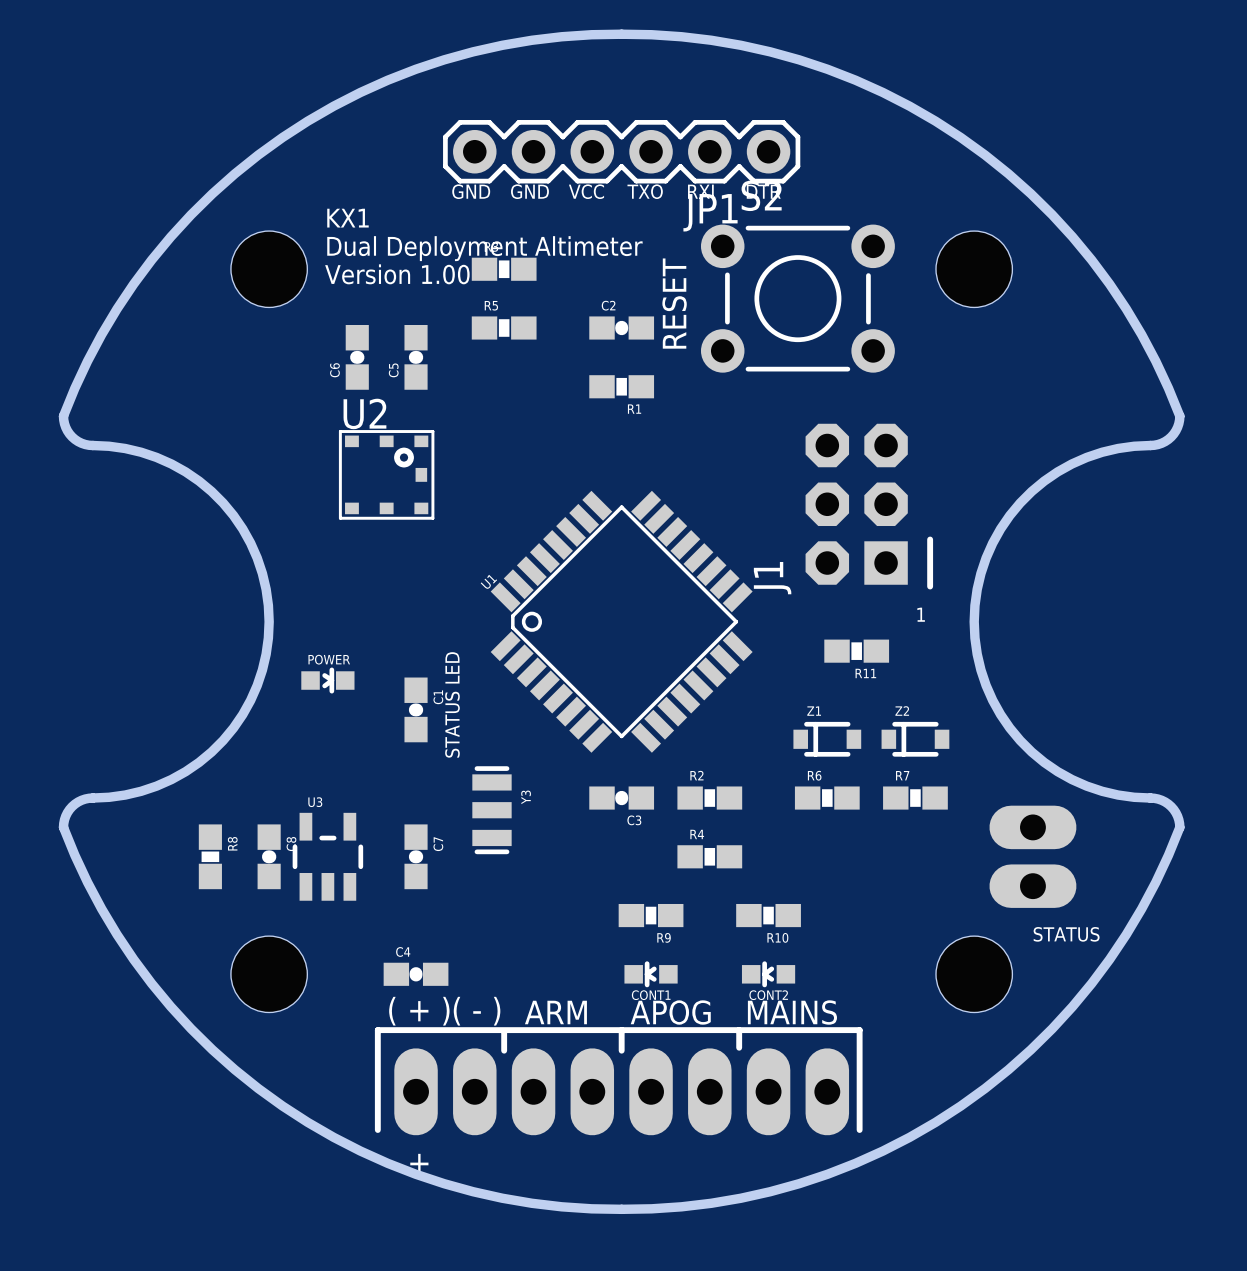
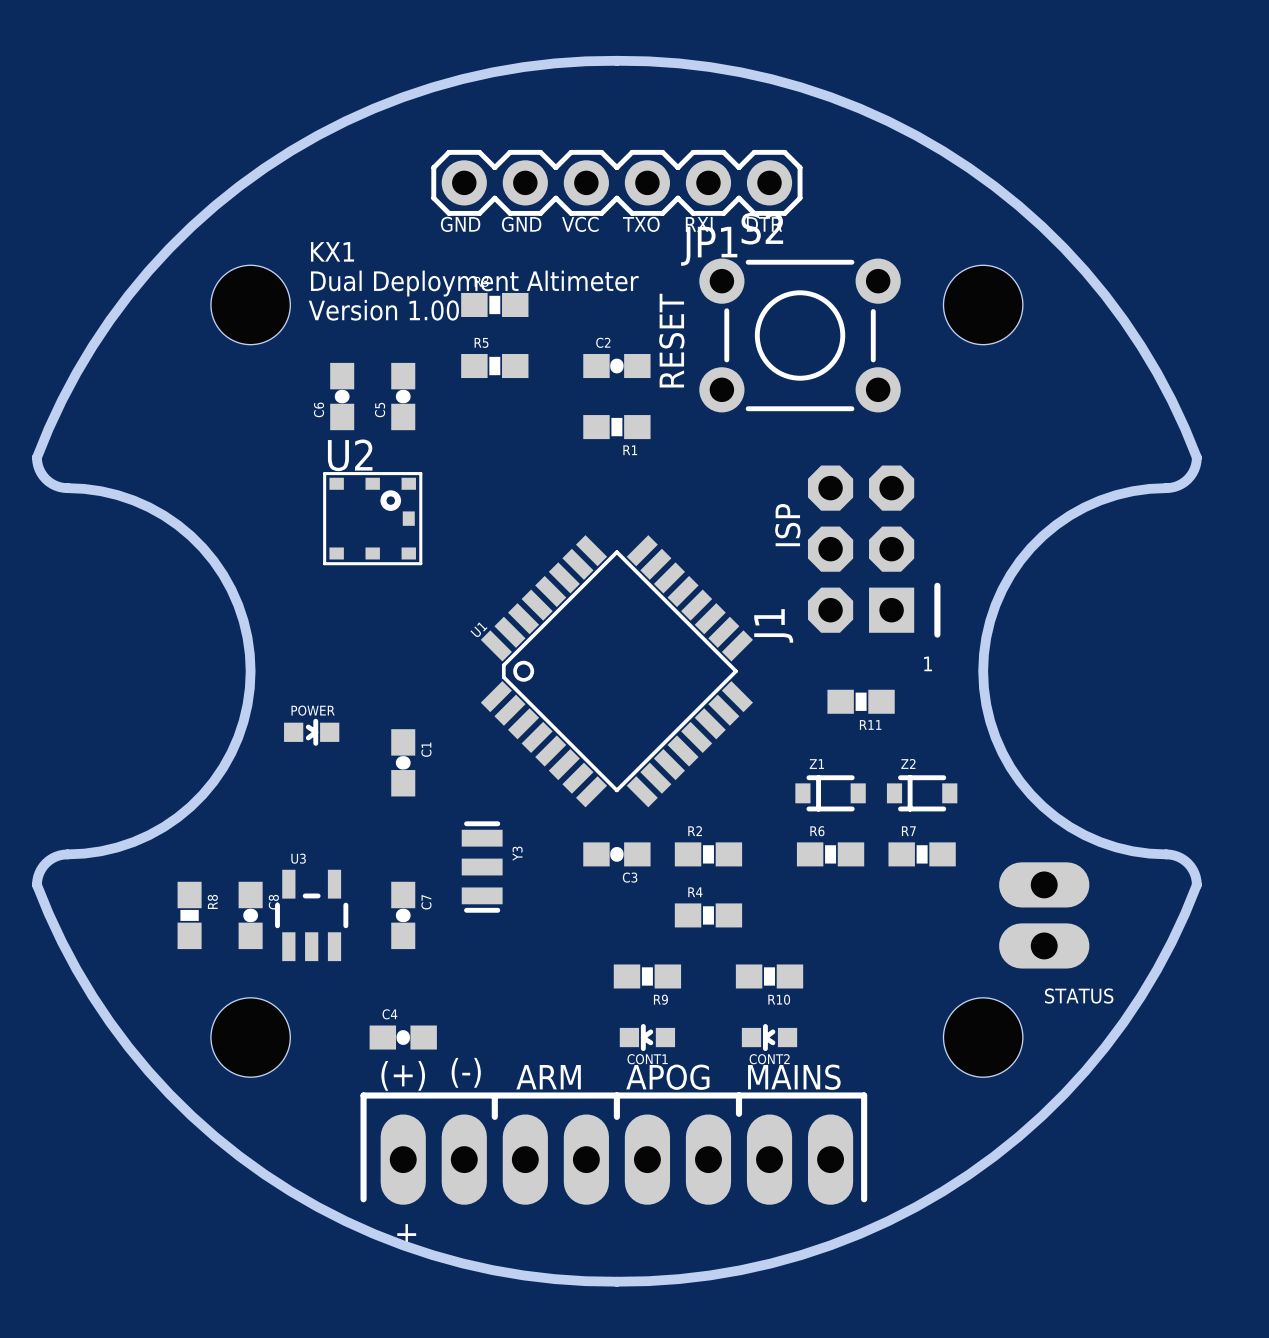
text: none -> ISP (787, 525)
text: STATUS LED (452, 704) -> none
text: ( + ) (419, 1011) -> (+) (403, 1075)
text: ( - ) (477, 1011) -> (-) (466, 1072)

